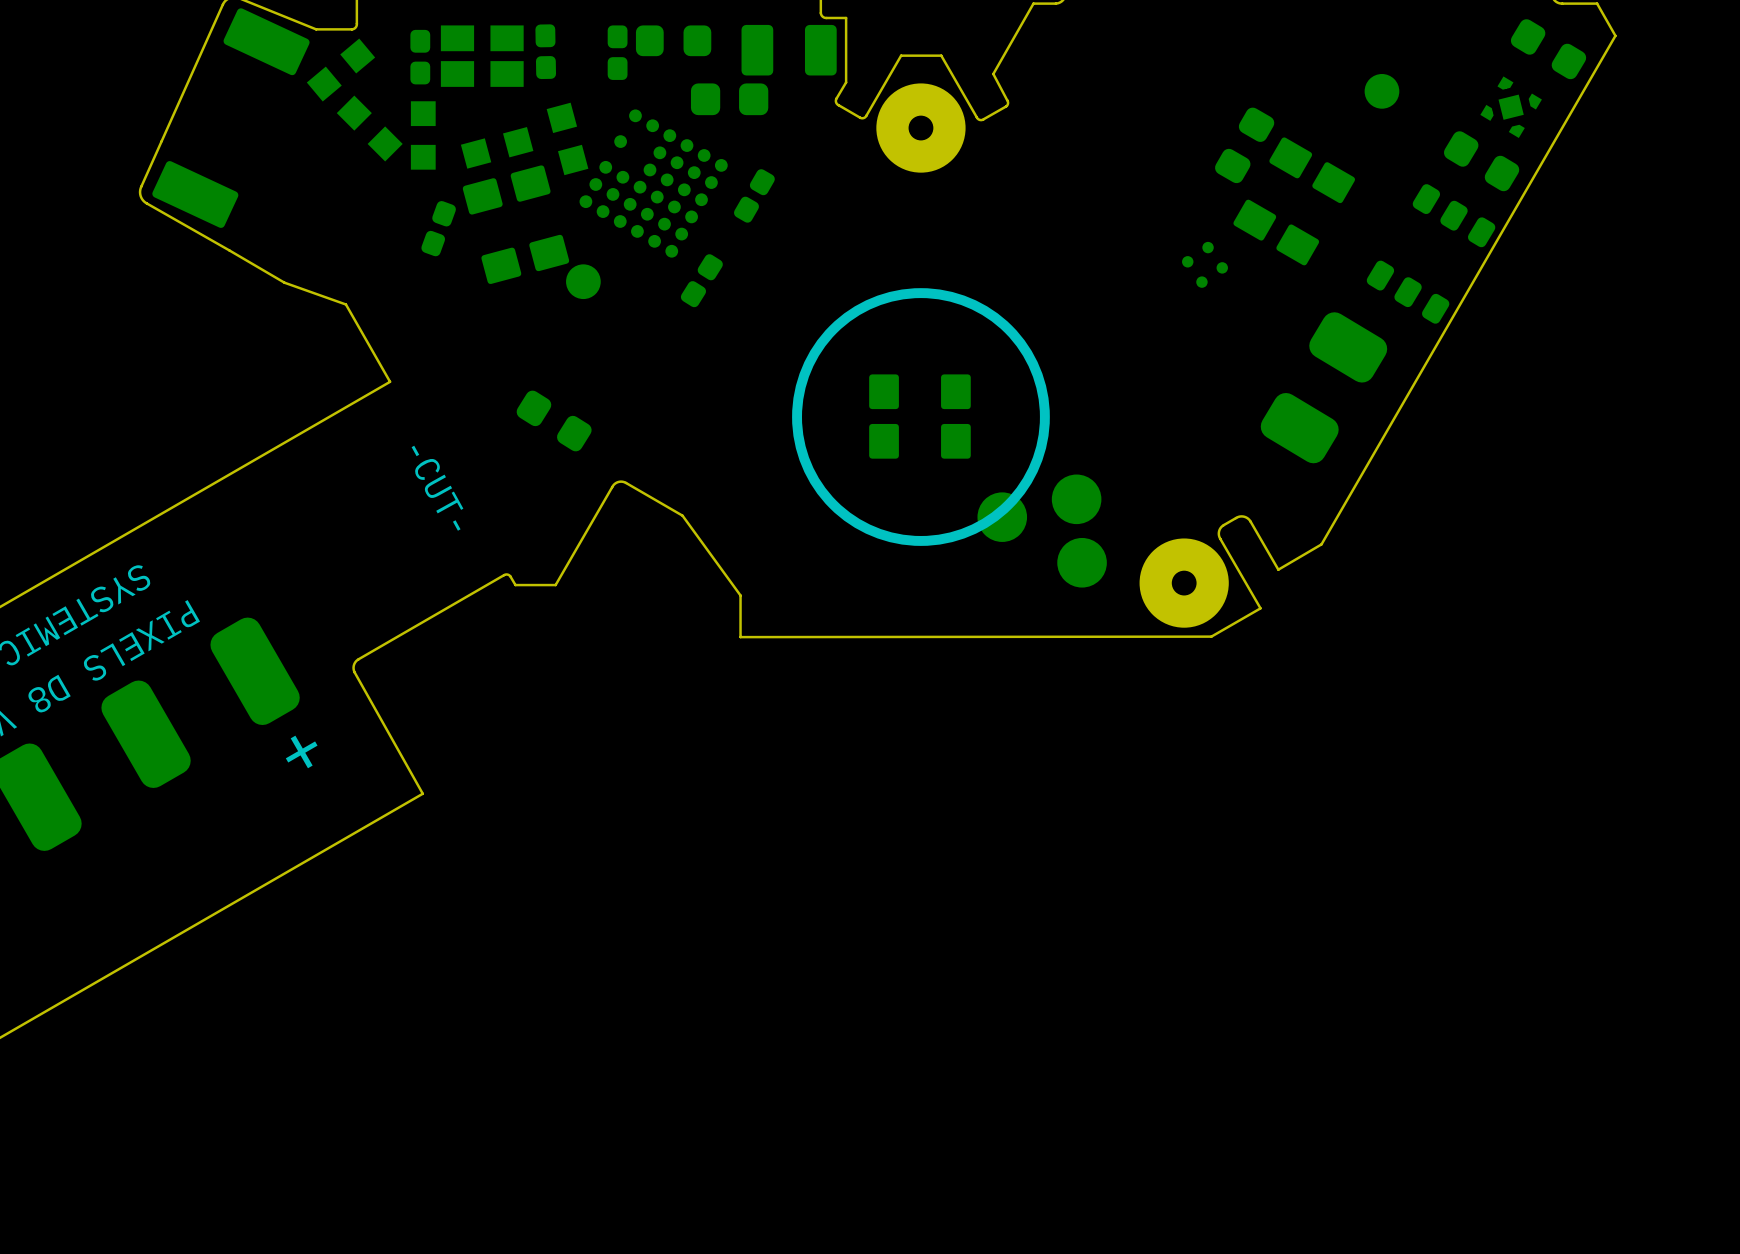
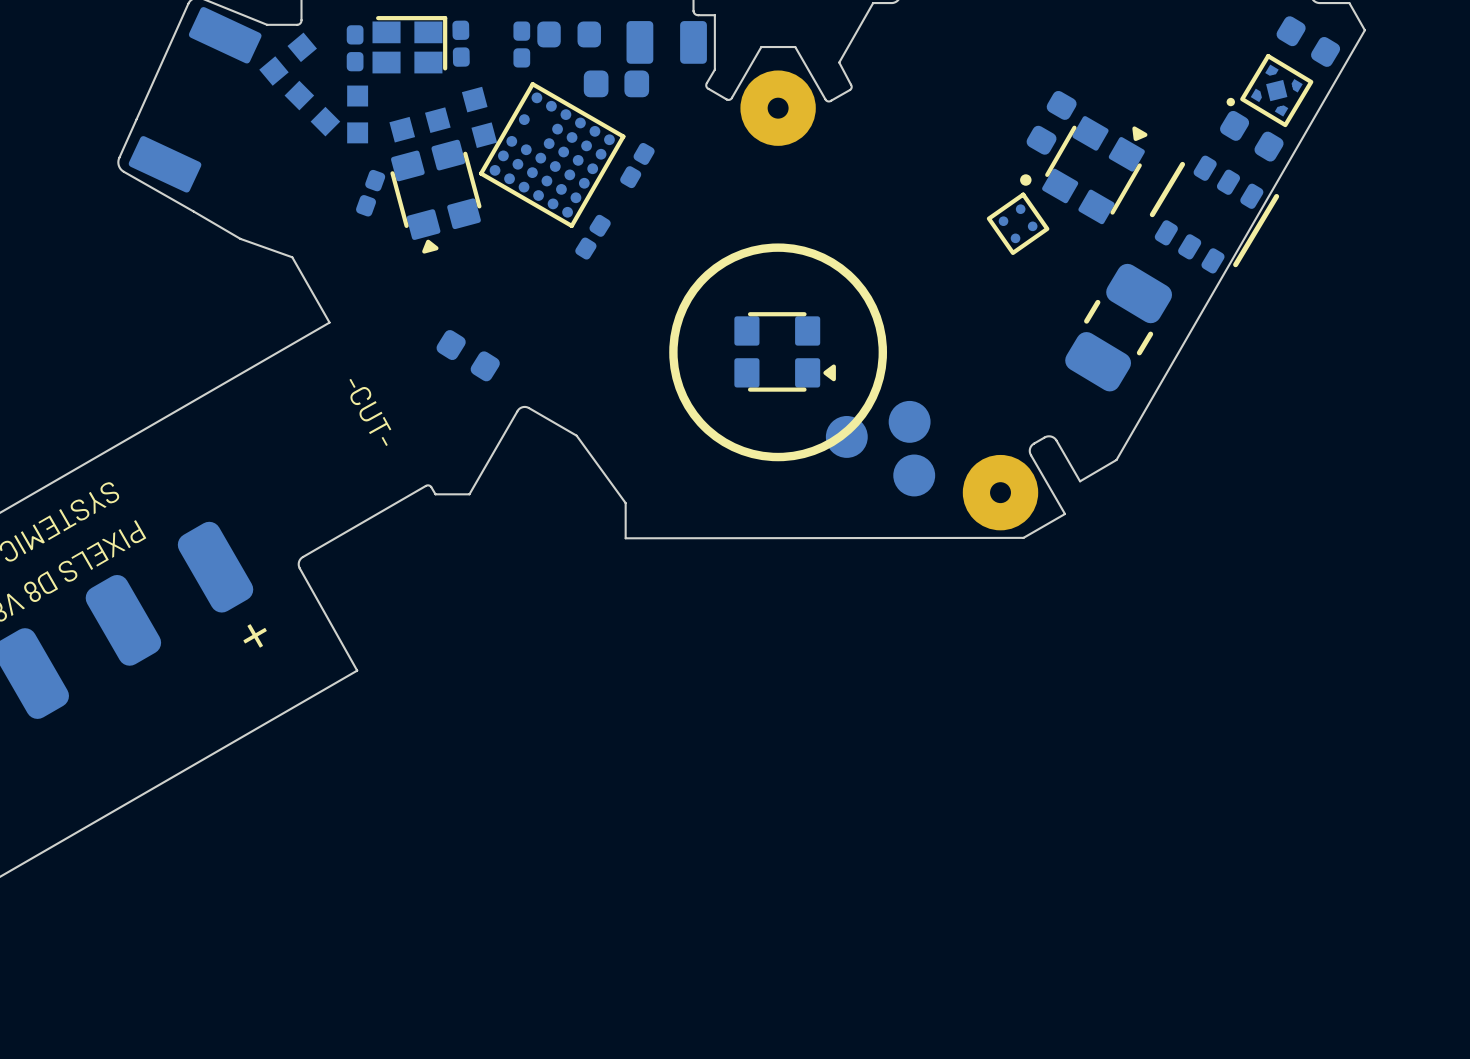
part footprint: [440, 25, 524, 87] -> [372, 16, 448, 74]
part footprint: [1480, 76, 1542, 138] -> [1226, 54, 1314, 128]
part: (1381, 91) -> none
part footprint: [579, 109, 728, 258] -> [479, 82, 626, 229]
part footprint: [1233, 137, 1356, 266] -> [1042, 116, 1148, 225]
part footprint: [462, 165, 570, 285] -> [390, 139, 482, 254]
part footprint: [1366, 184, 1496, 324] -> [1149, 155, 1280, 274]
part footprint: [1182, 241, 1228, 288] -> [986, 174, 1050, 256]
part: (583, 281) -> none
part footprint: [1260, 312, 1388, 464] -> [1065, 263, 1173, 392]
part footprint: [869, 374, 971, 459] -> [734, 312, 836, 392]

